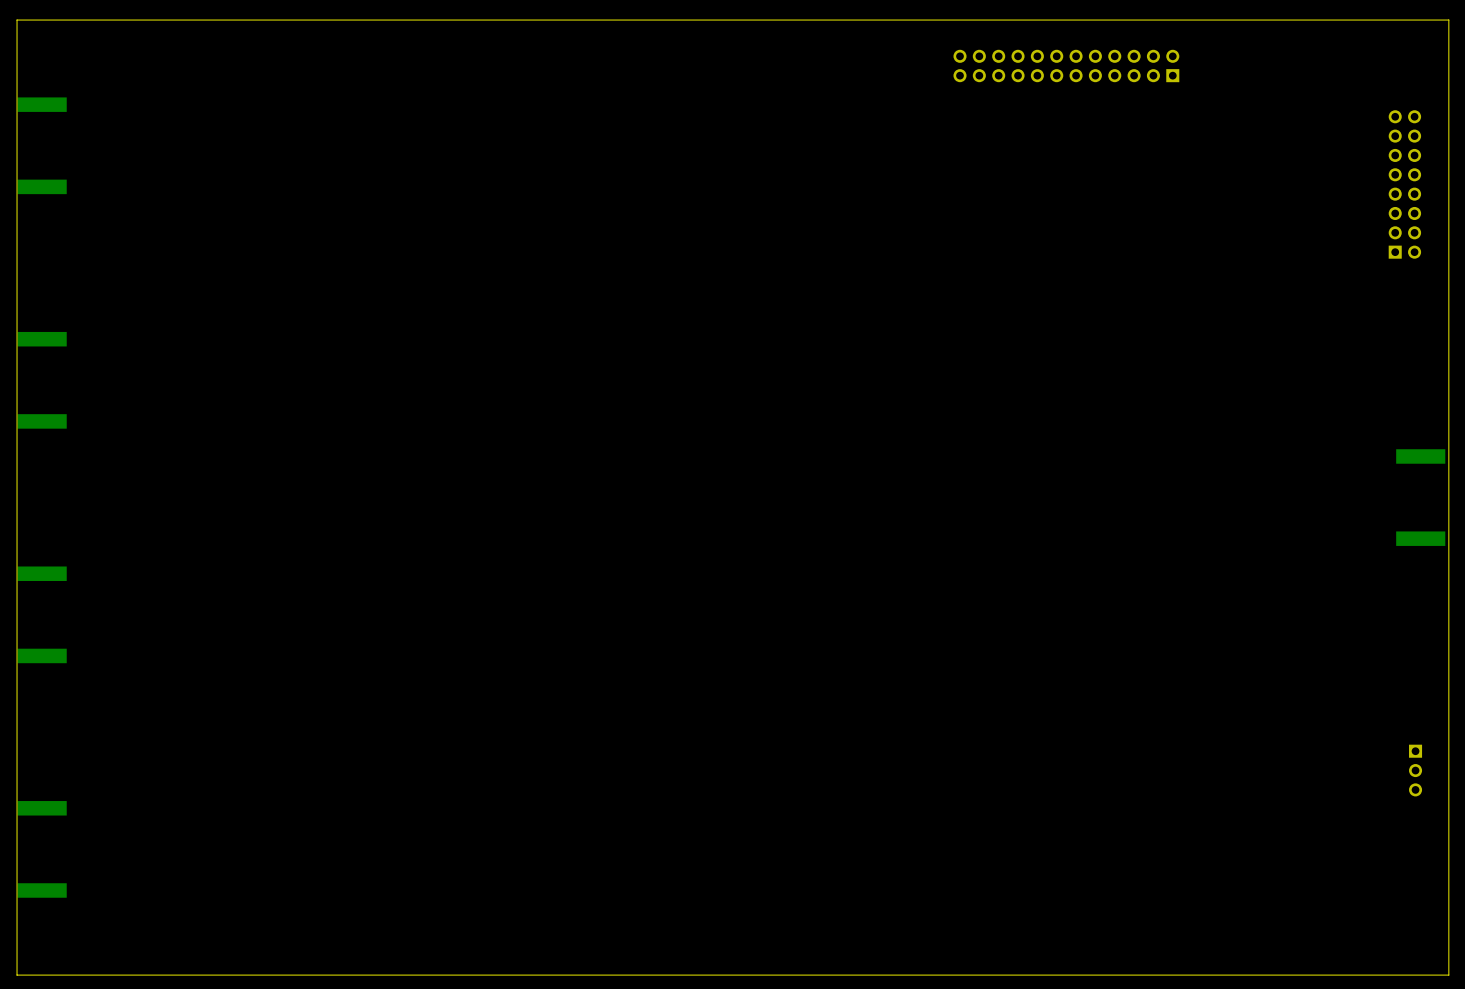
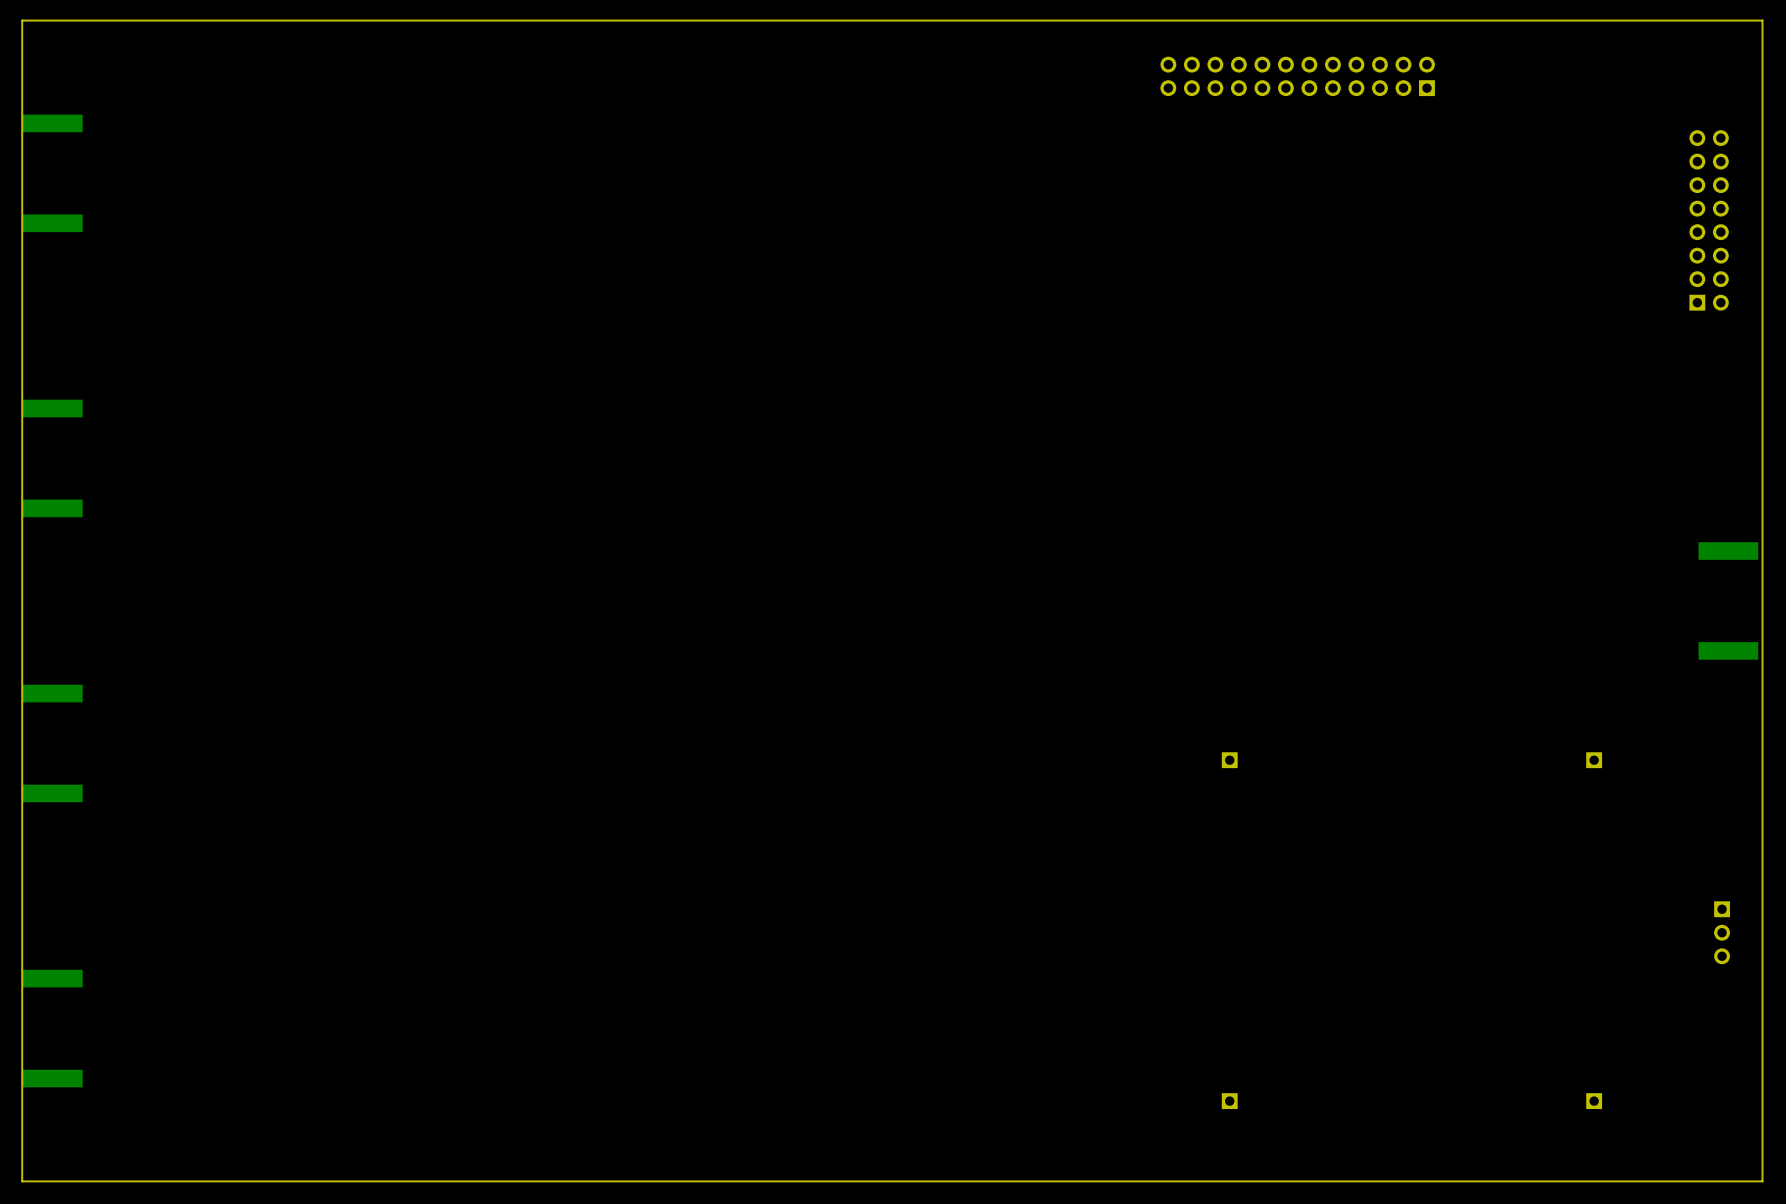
part: none -> (1229, 760)
part: none -> (1594, 760)
part: none -> (1229, 1101)
part: none -> (1594, 1101)

